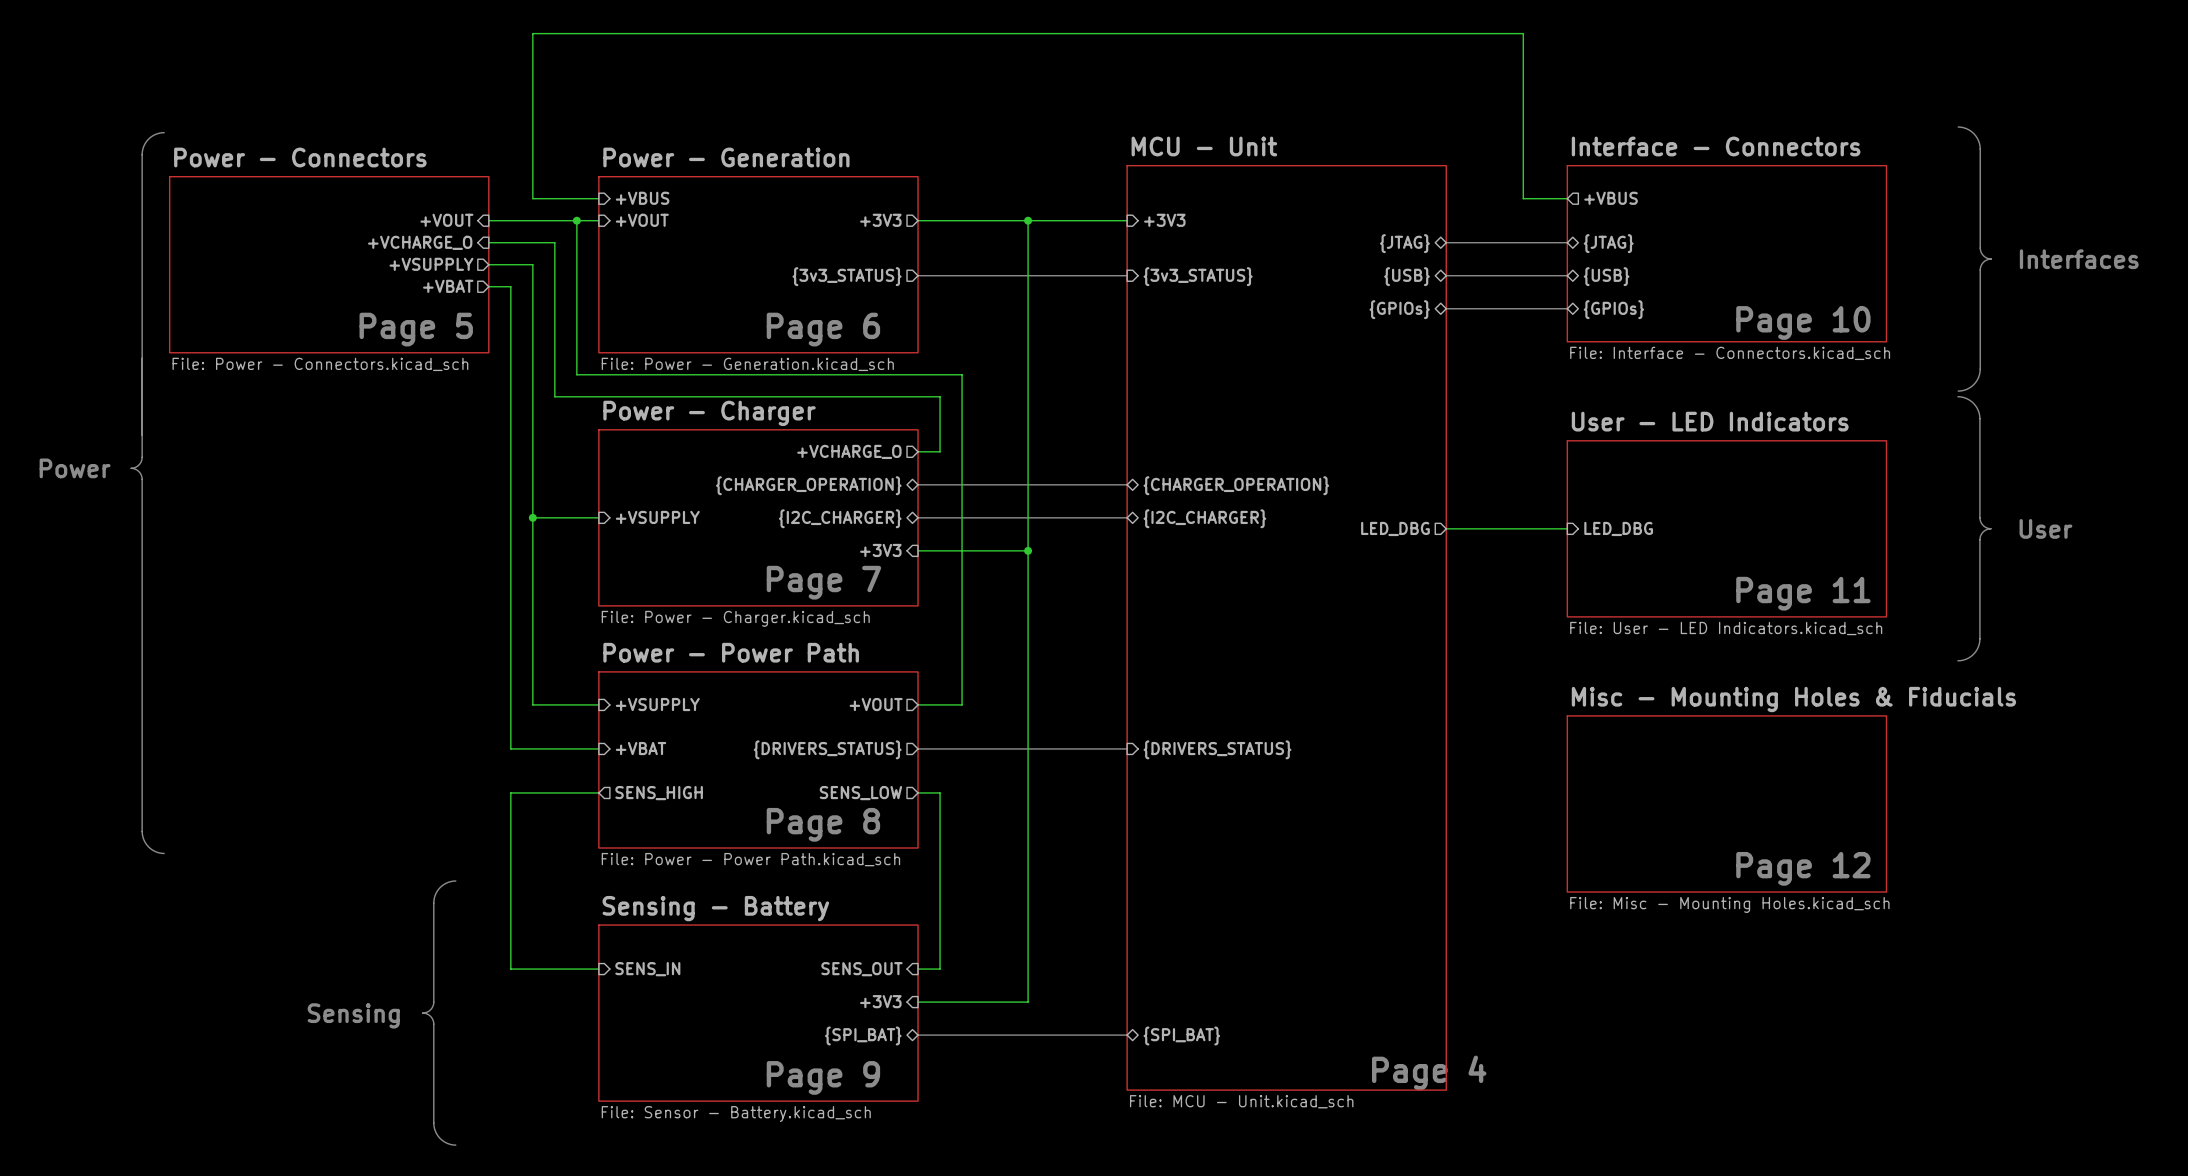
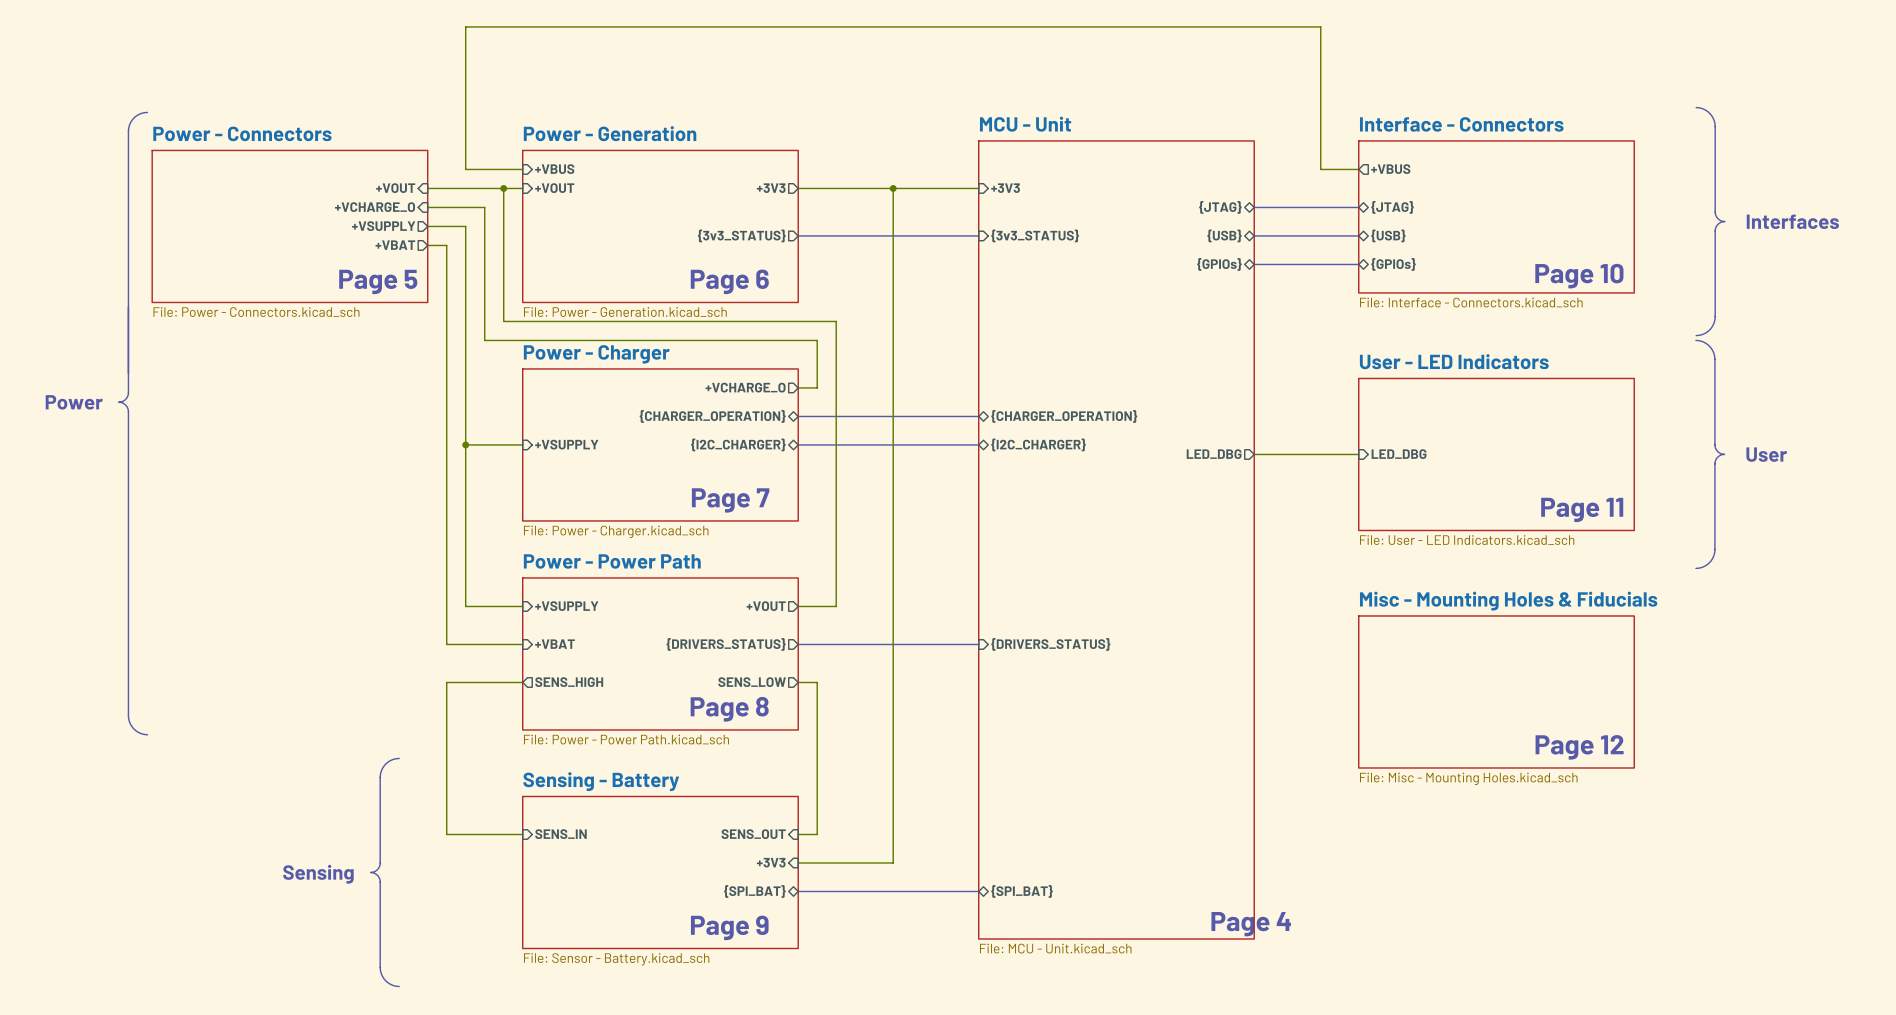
sheet pin: +3V3 (880, 550) -> none
wire: (918, 550) (1028, 550) -> none
junction: (1028, 550) -> none

